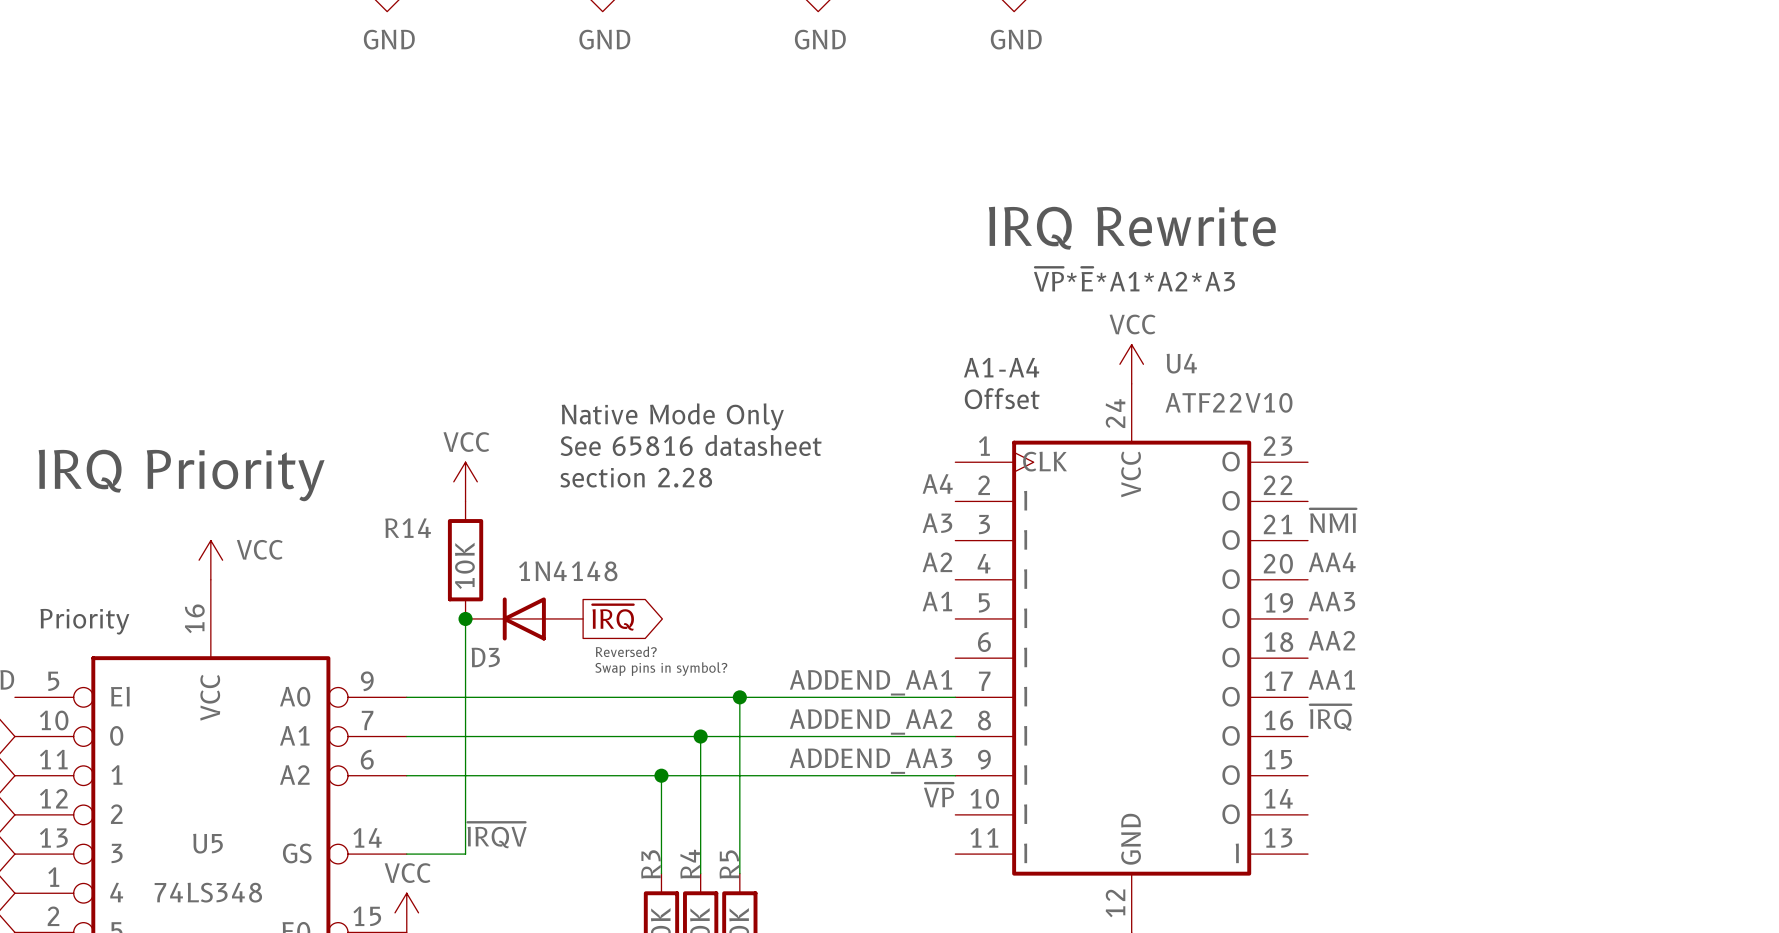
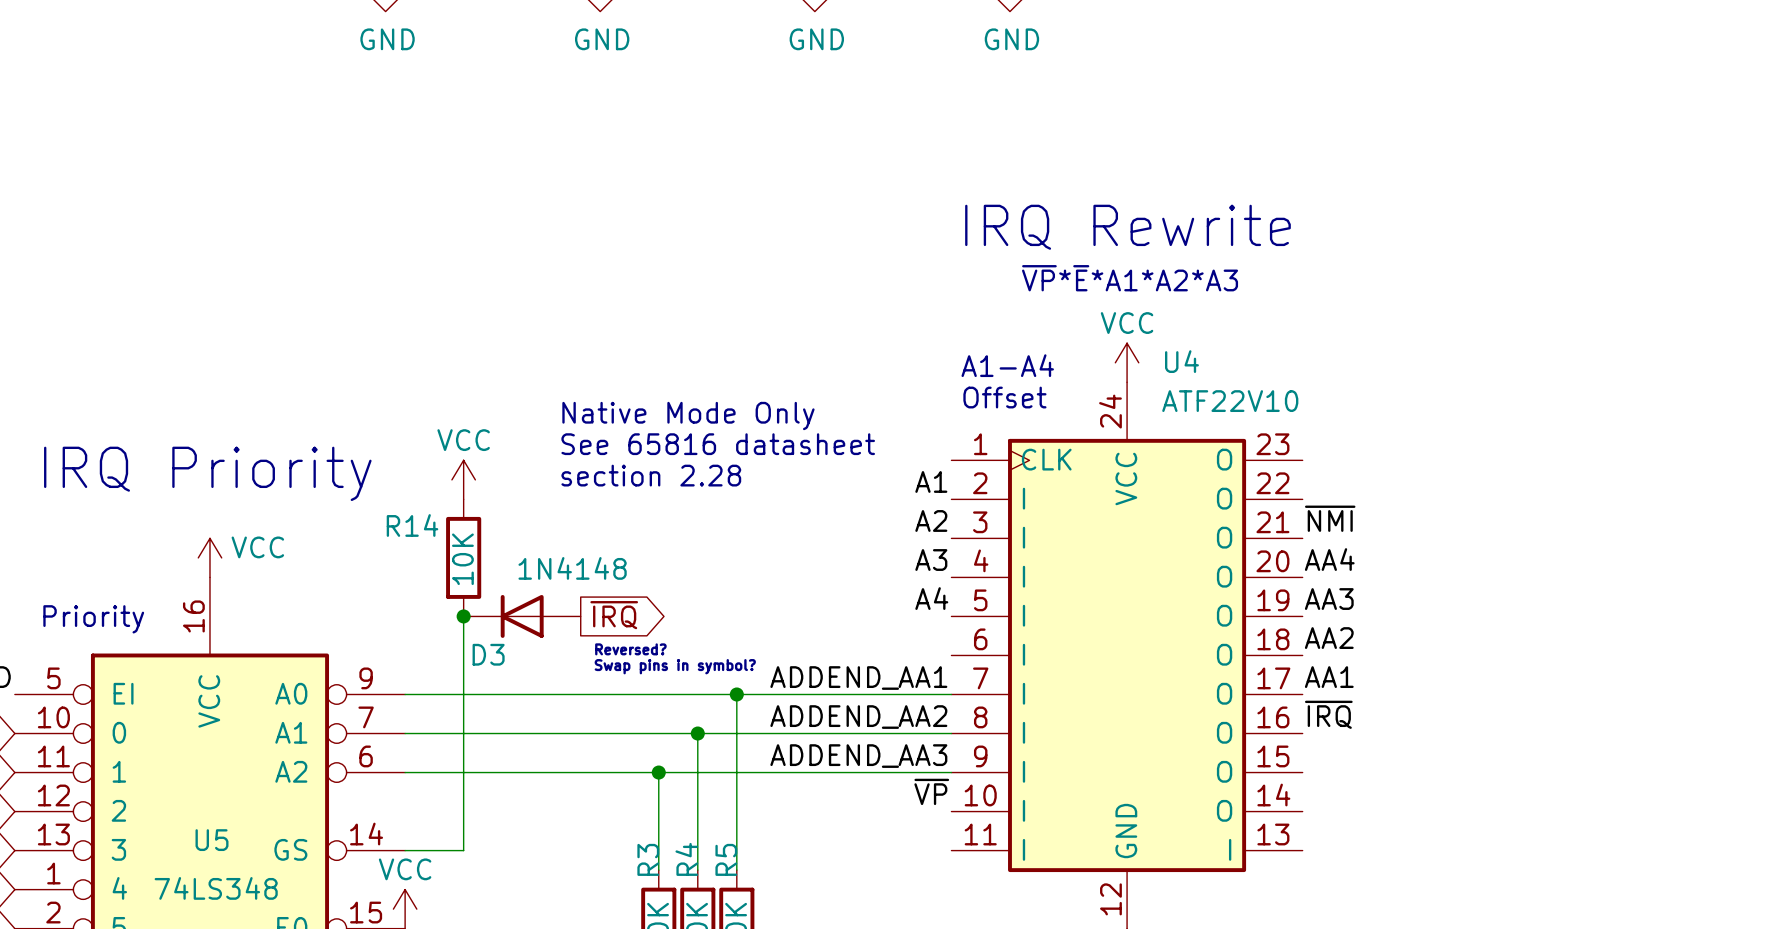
label: A4 (937, 483) -> A1 (931, 481)
label: A3 (937, 523) -> A2 (931, 520)
label: A2 (937, 562) -> A3 (931, 560)
label: A1 (937, 601) -> A4 (931, 598)
label: ~{IRQV} (497, 835) -> none

